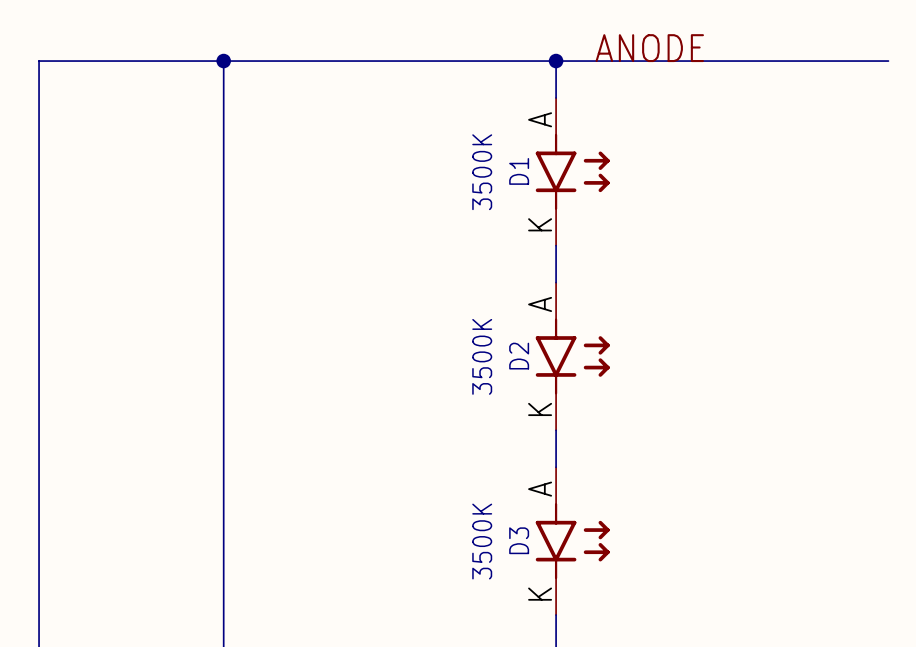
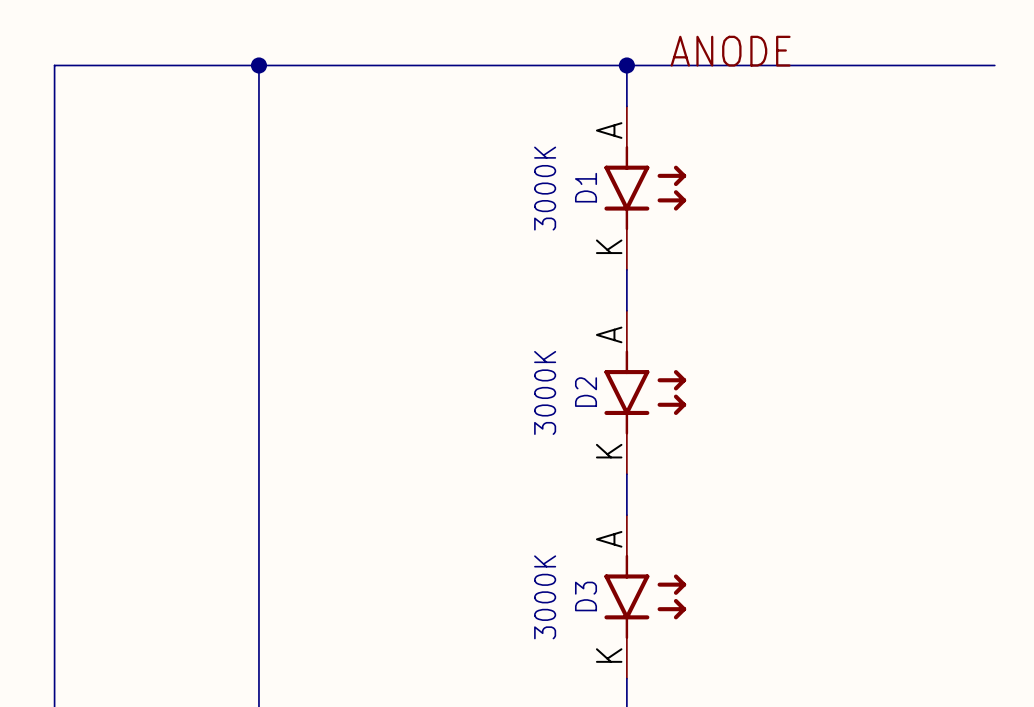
D1 value: 3500K (482, 172) -> 3000K (545, 188)
D2 value: 3500K (482, 356) -> 3000K (545, 392)
D3 value: 3500K (482, 541) -> 3000K (545, 597)

